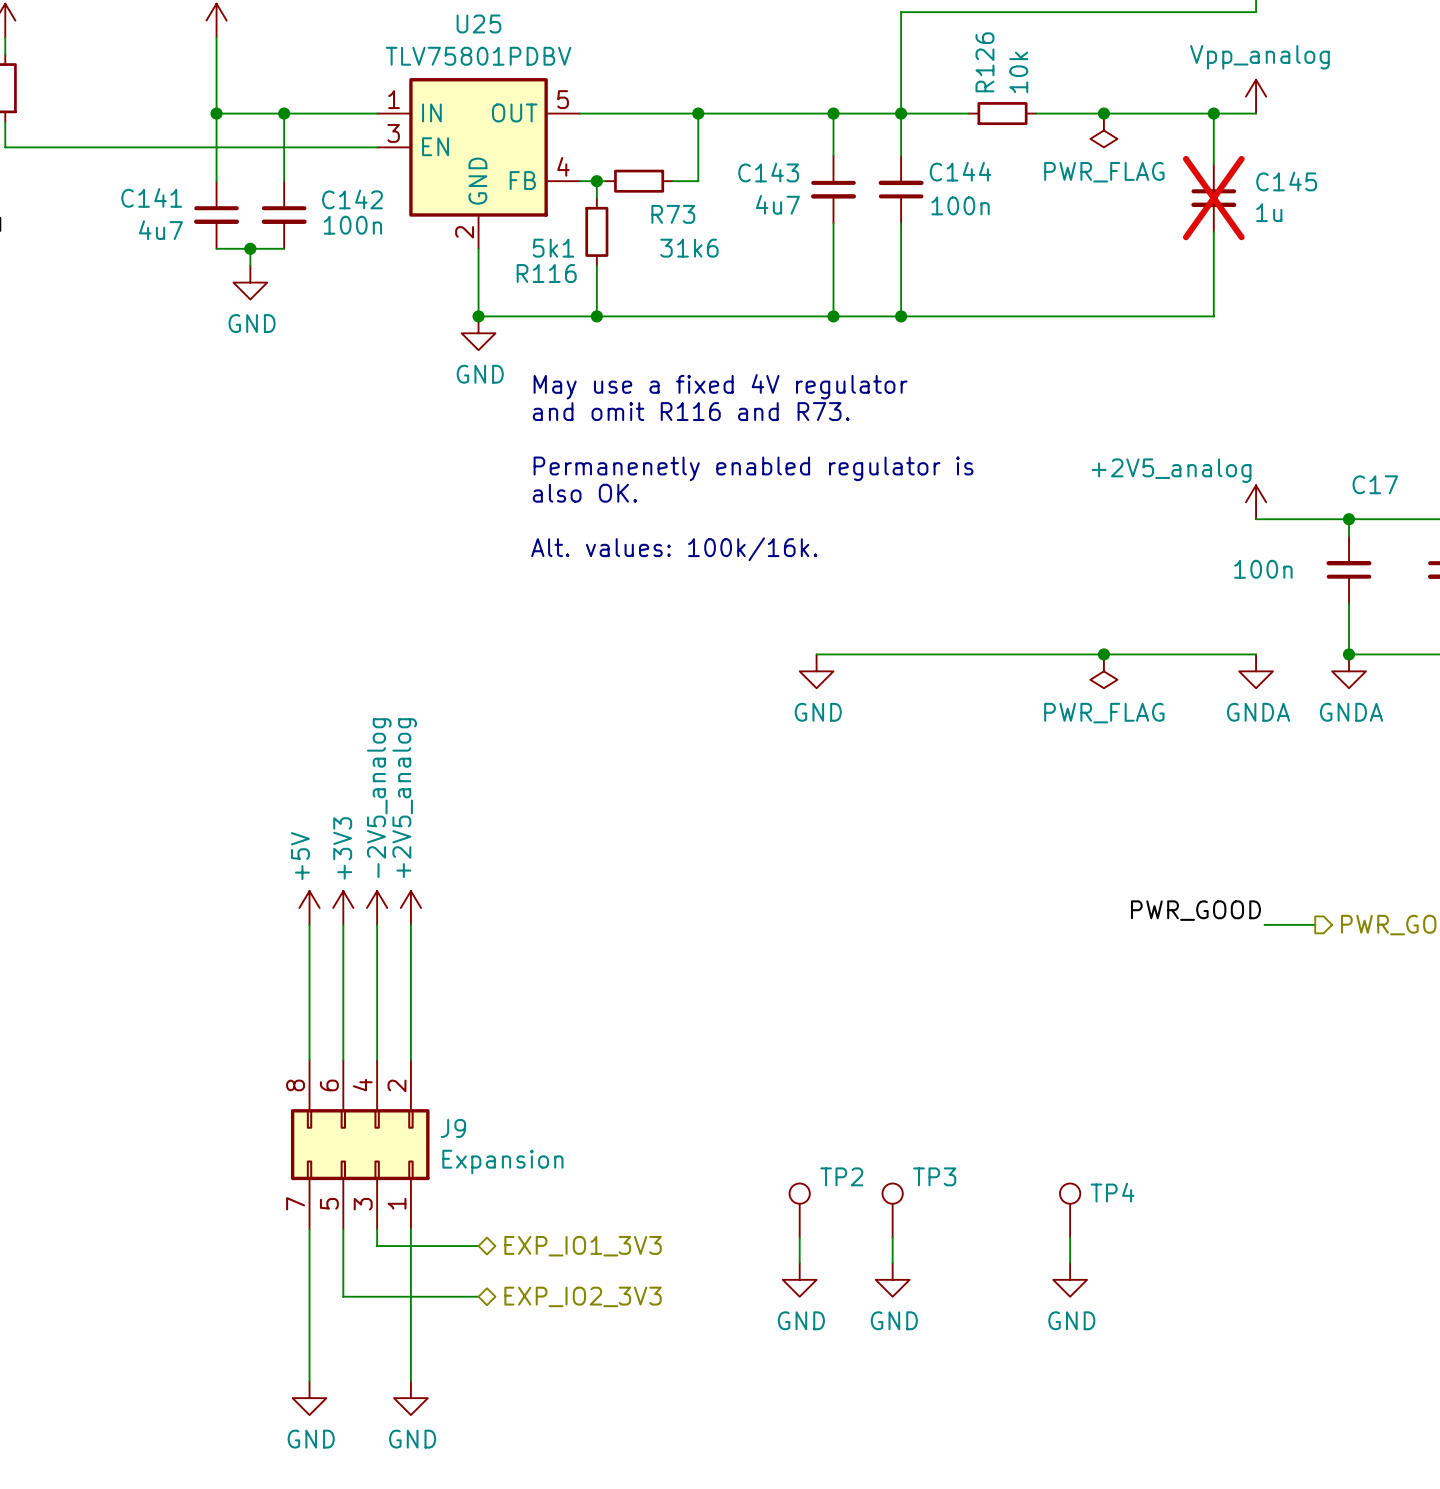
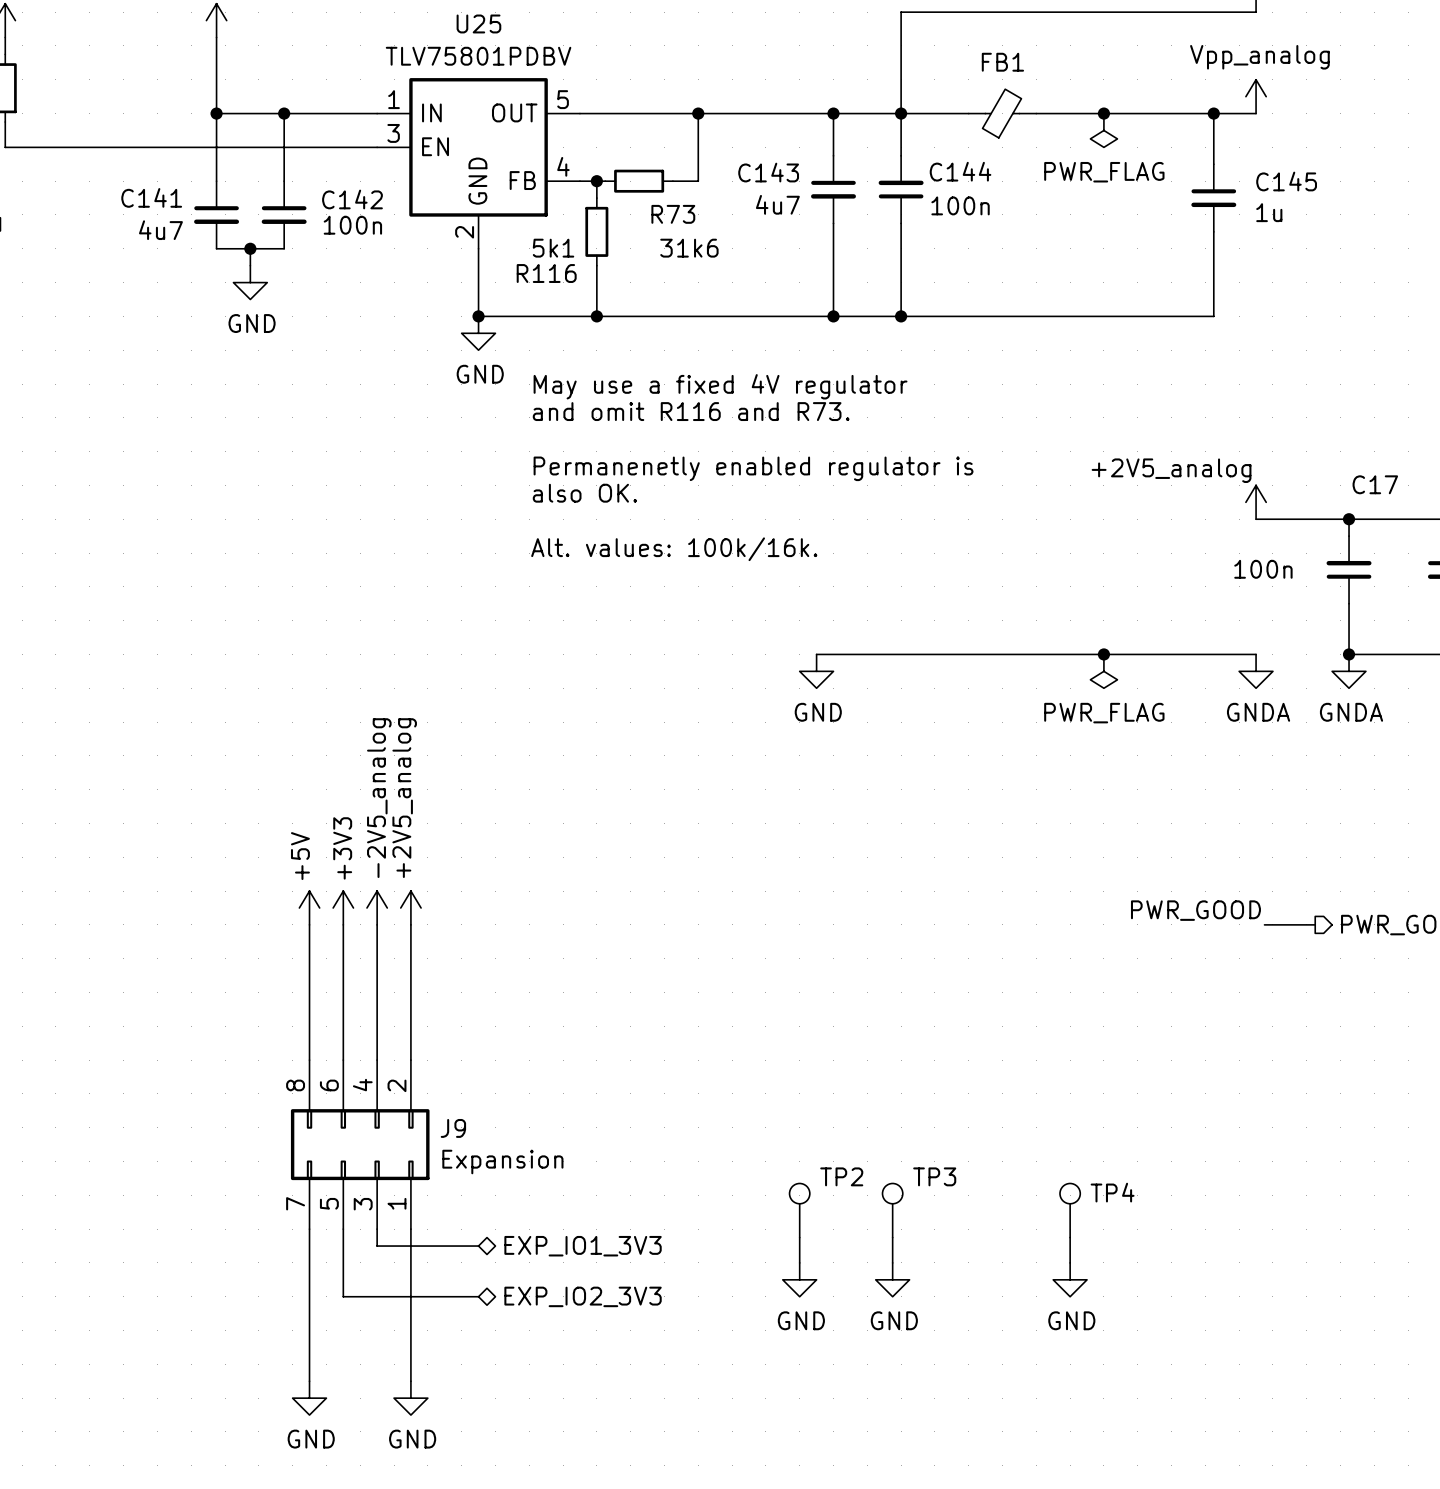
R126: 10k (1002, 113) -> none
FB1: none -> (1002, 113)
C145 do-not-place cross: (1213, 198) -> none

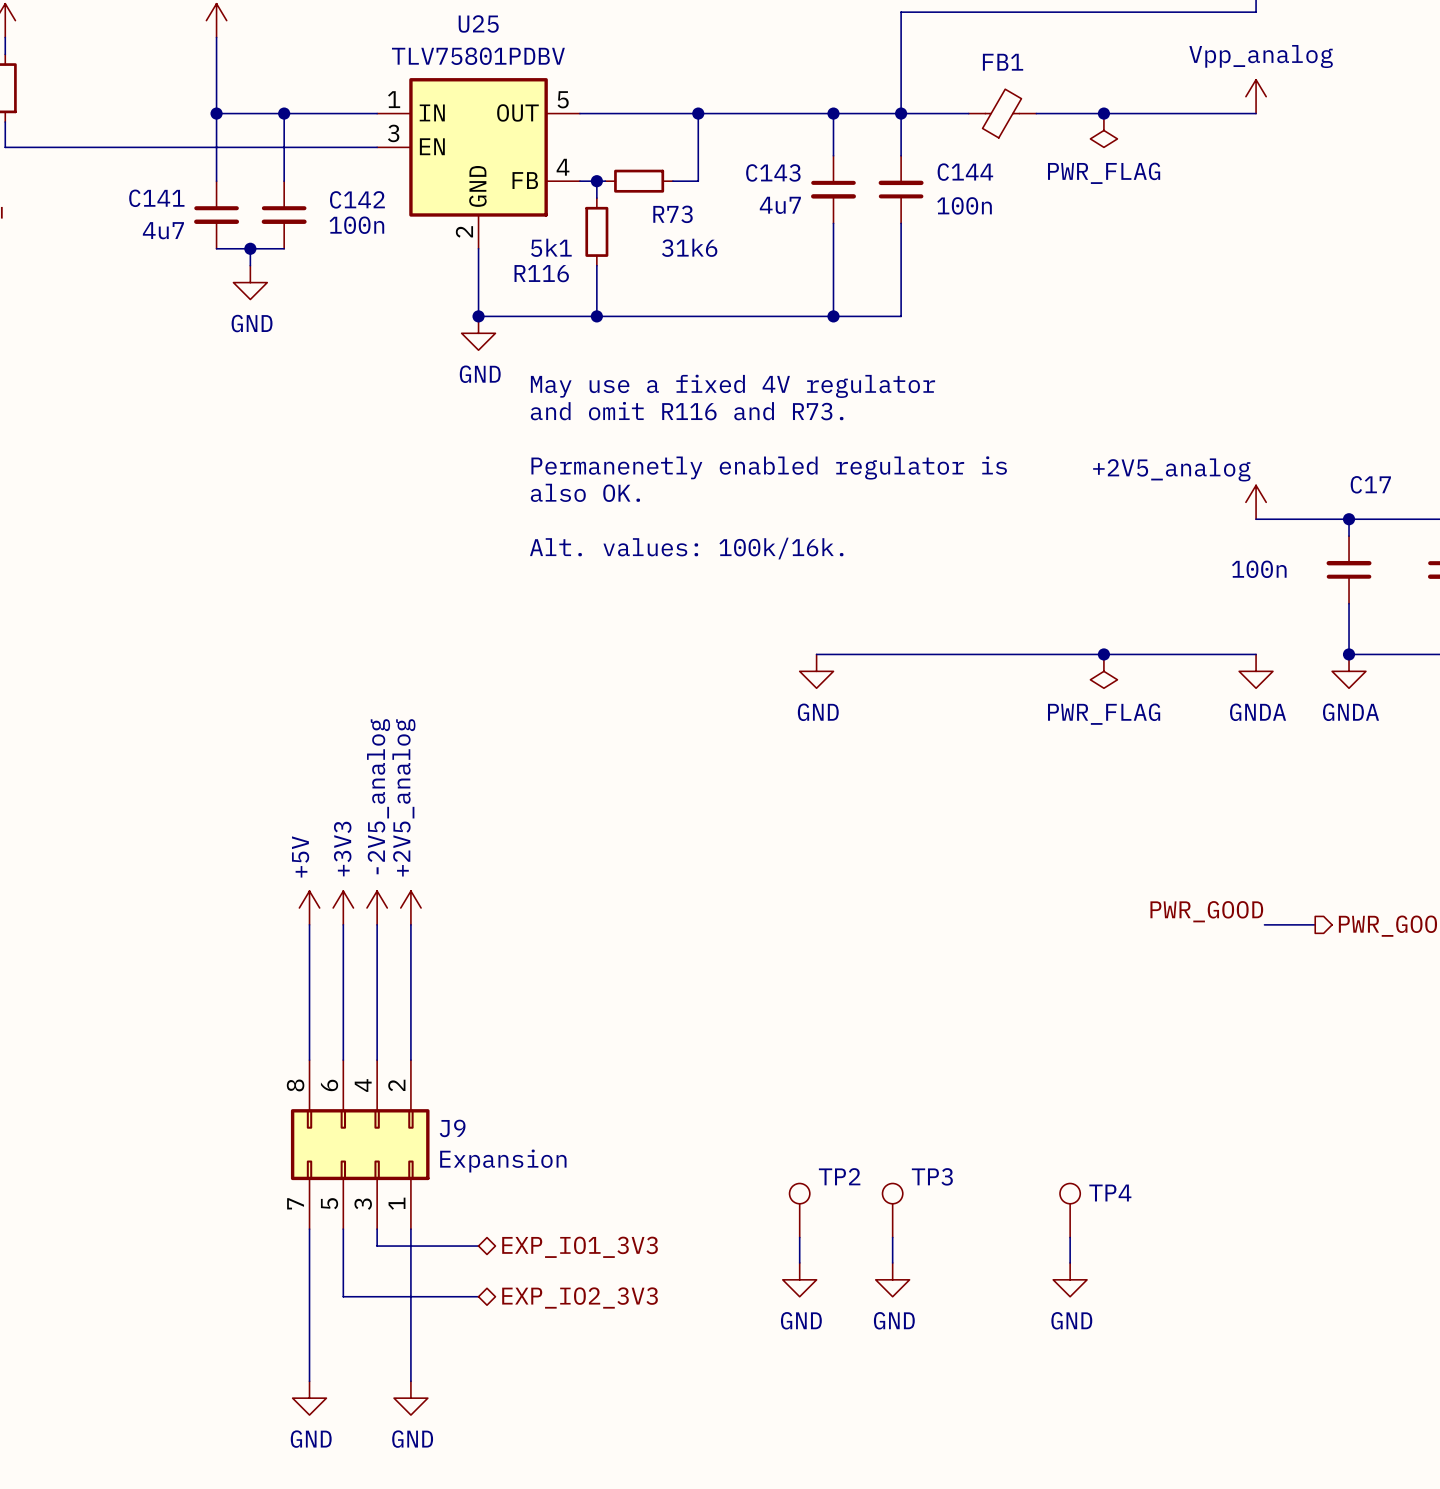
wire: (1213, 113) (1213, 164) -> none
junction: (1213, 113) -> none
C145: 1u (1213, 198) -> none
wire: (1213, 231) (1213, 316) (901, 316) -> none
junction: (901, 316) -> none

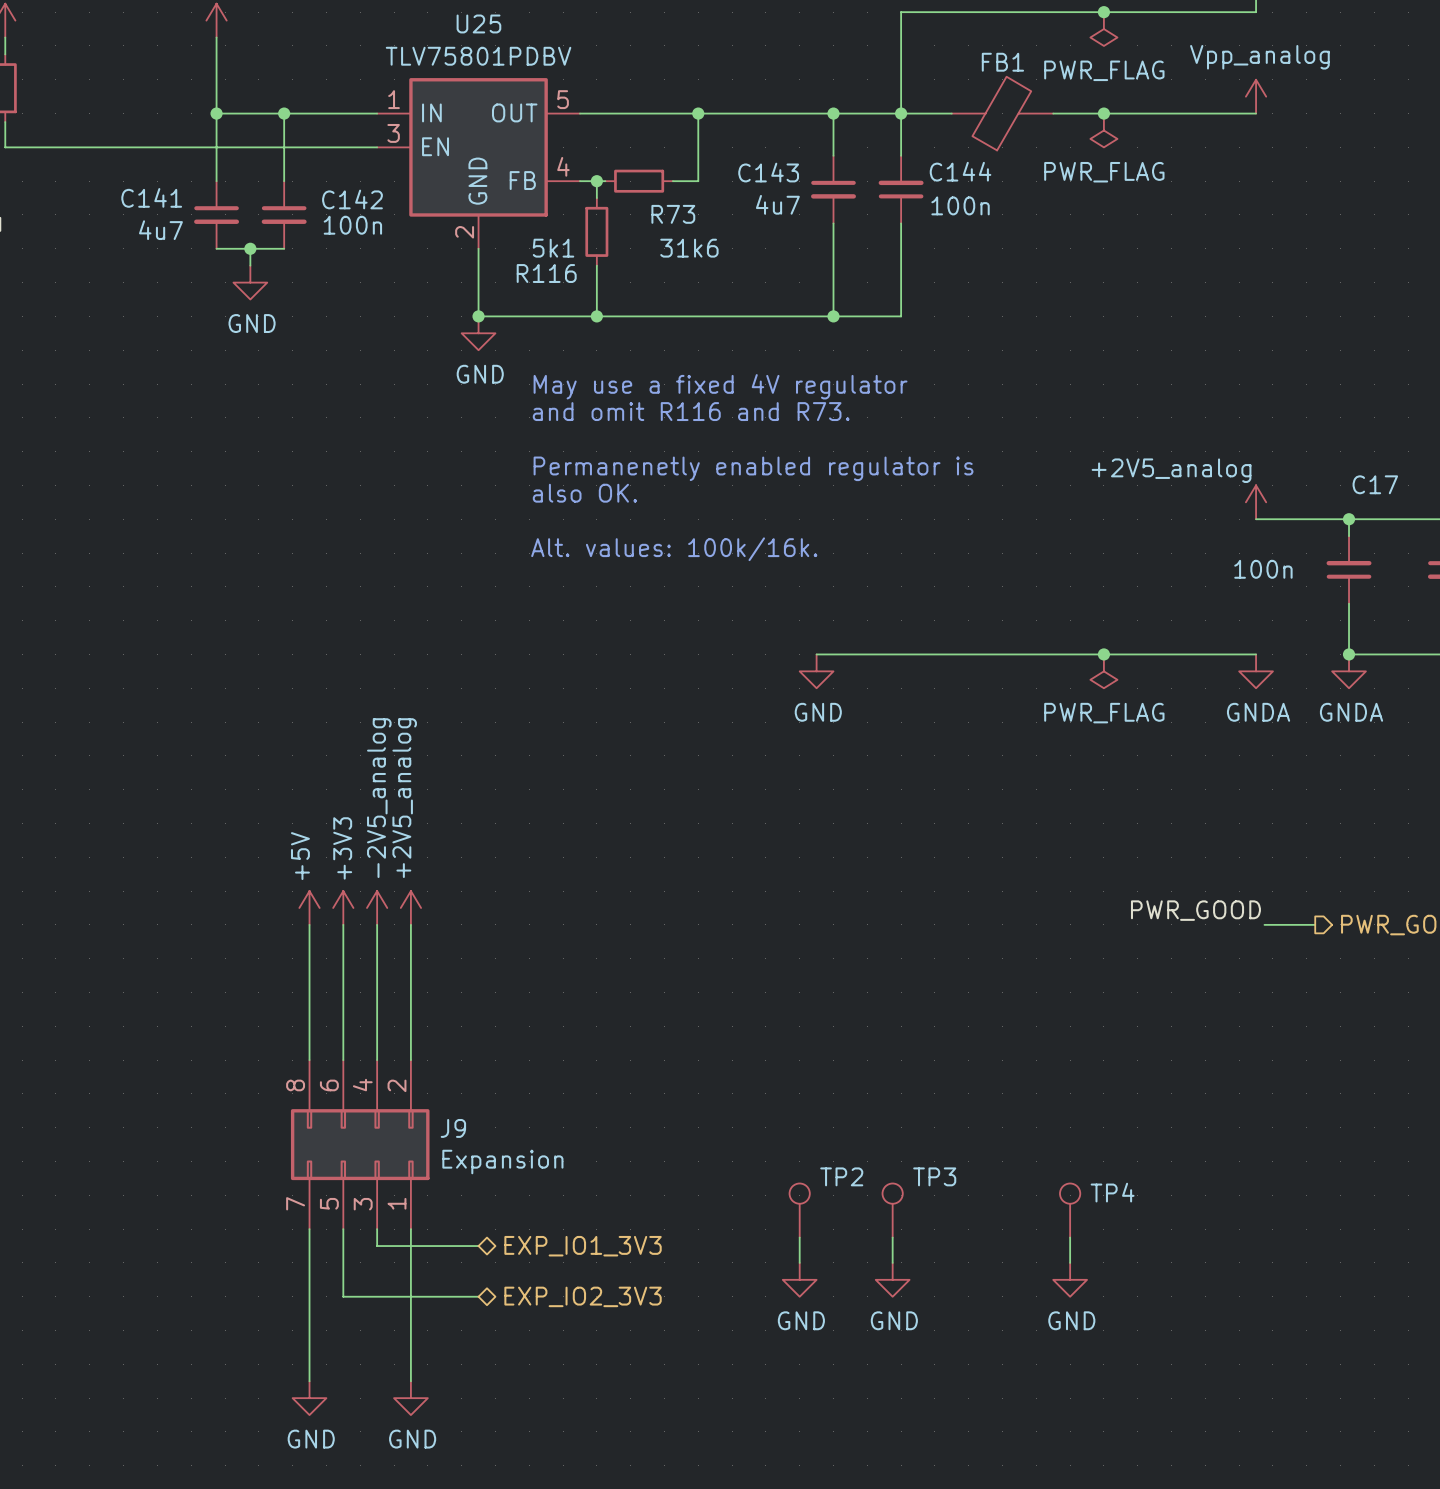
junction: none -> (1103, 12)
power symbol: none -> PWR_FLAG (1103, 29)
FB1 symbol: [968, 89, 1037, 138] -> [951, 76, 1054, 151]

